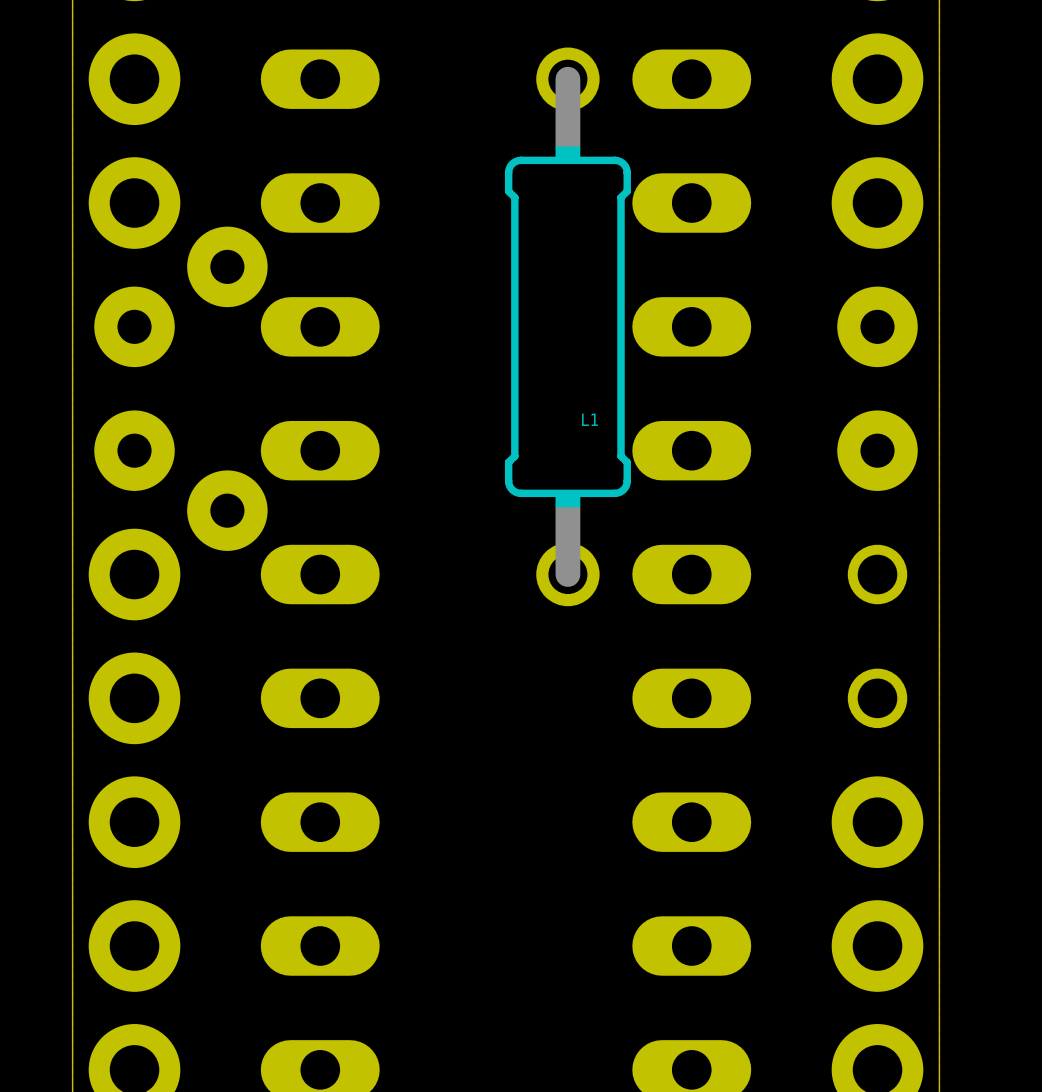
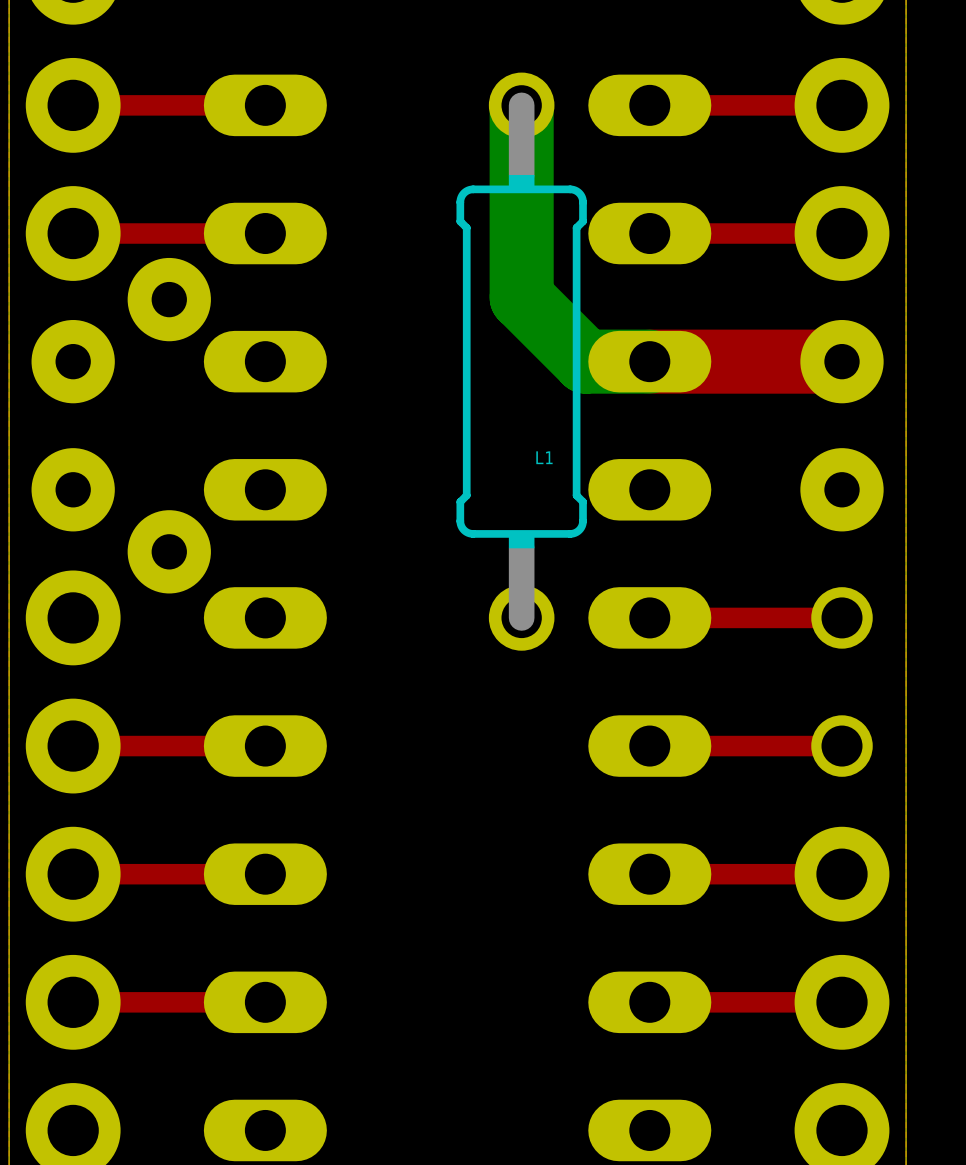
top track: none -> (265, 105) (73, 105)
bottom track: none -> (521, 105) (521, 297) (585, 361) (649, 361)
top track: none -> (842, 105) (649, 105)
top track: none -> (265, 233) (73, 233)
top track: none -> (842, 233) (649, 233)
top track: none -> (842, 361) (649, 361)
top track: none -> (842, 617) (649, 617)
top track: none -> (265, 746) (73, 746)
top track: none -> (842, 746) (649, 746)
top track: none -> (265, 874) (73, 874)
top track: none -> (842, 874) (649, 874)
top track: none -> (265, 1002) (73, 1002)
top track: none -> (842, 1002) (649, 1002)

